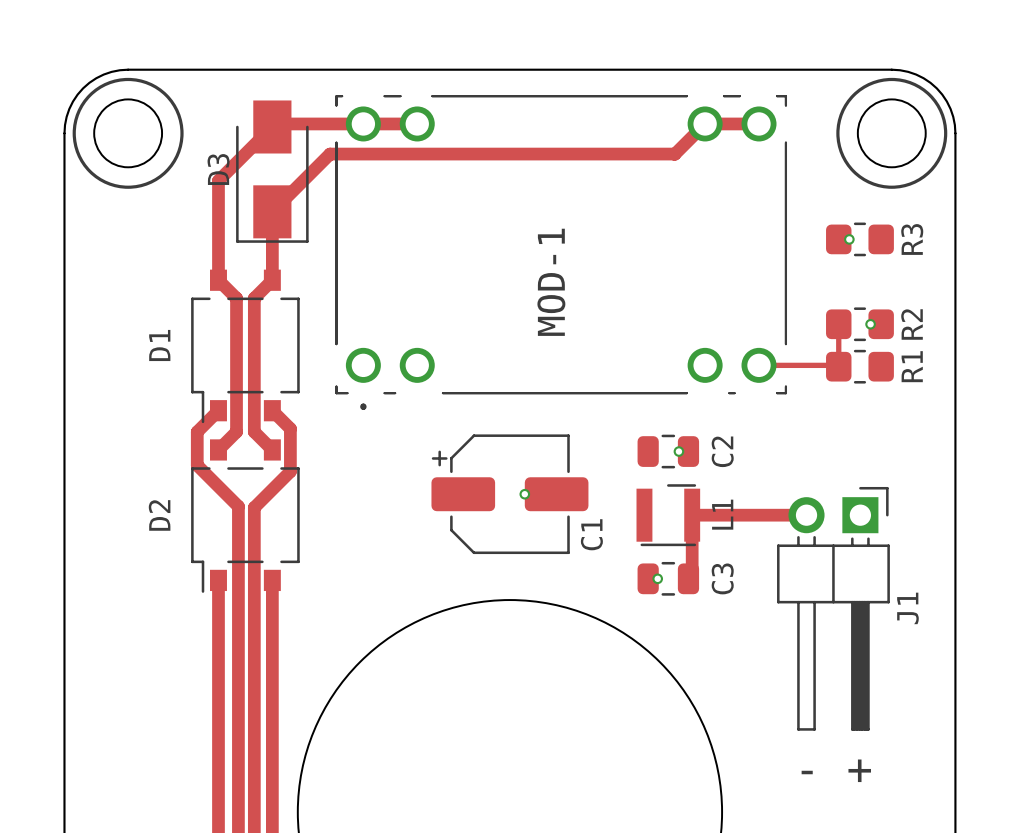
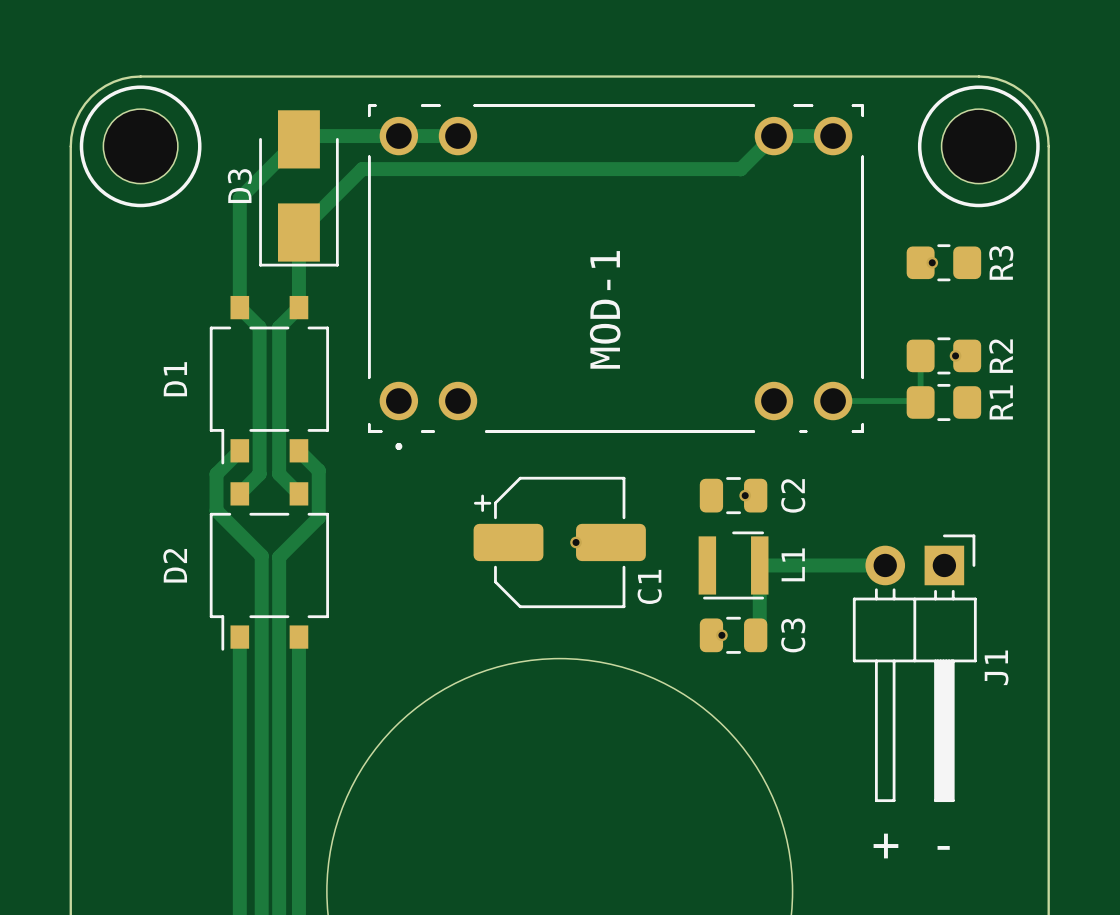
text: - + (836, 770) -> + - (911, 846)

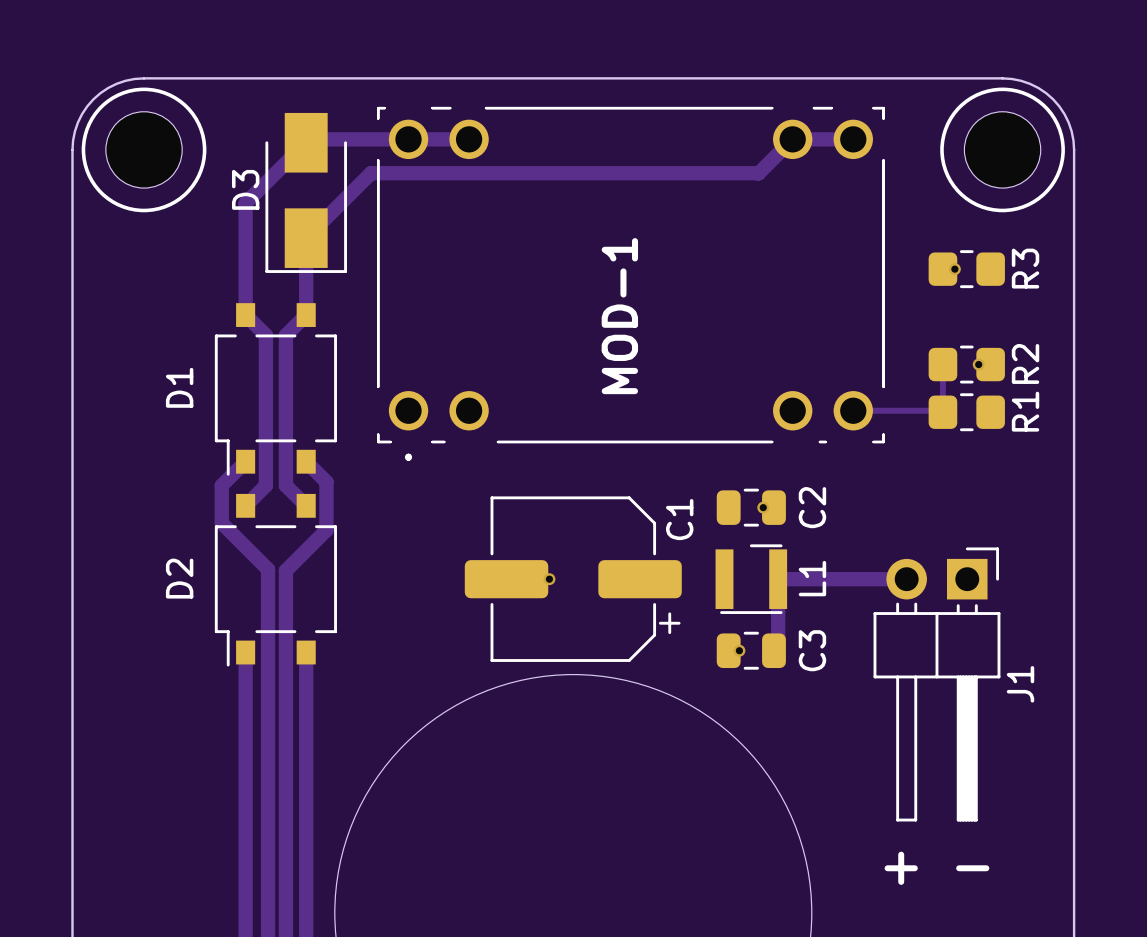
C1 footprint: [473, 476, 646, 609] -> [464, 496, 682, 662]
via position: (576, 542) -> (549, 579)
C1 name position: C1 (649, 586) -> C1 (679, 519)

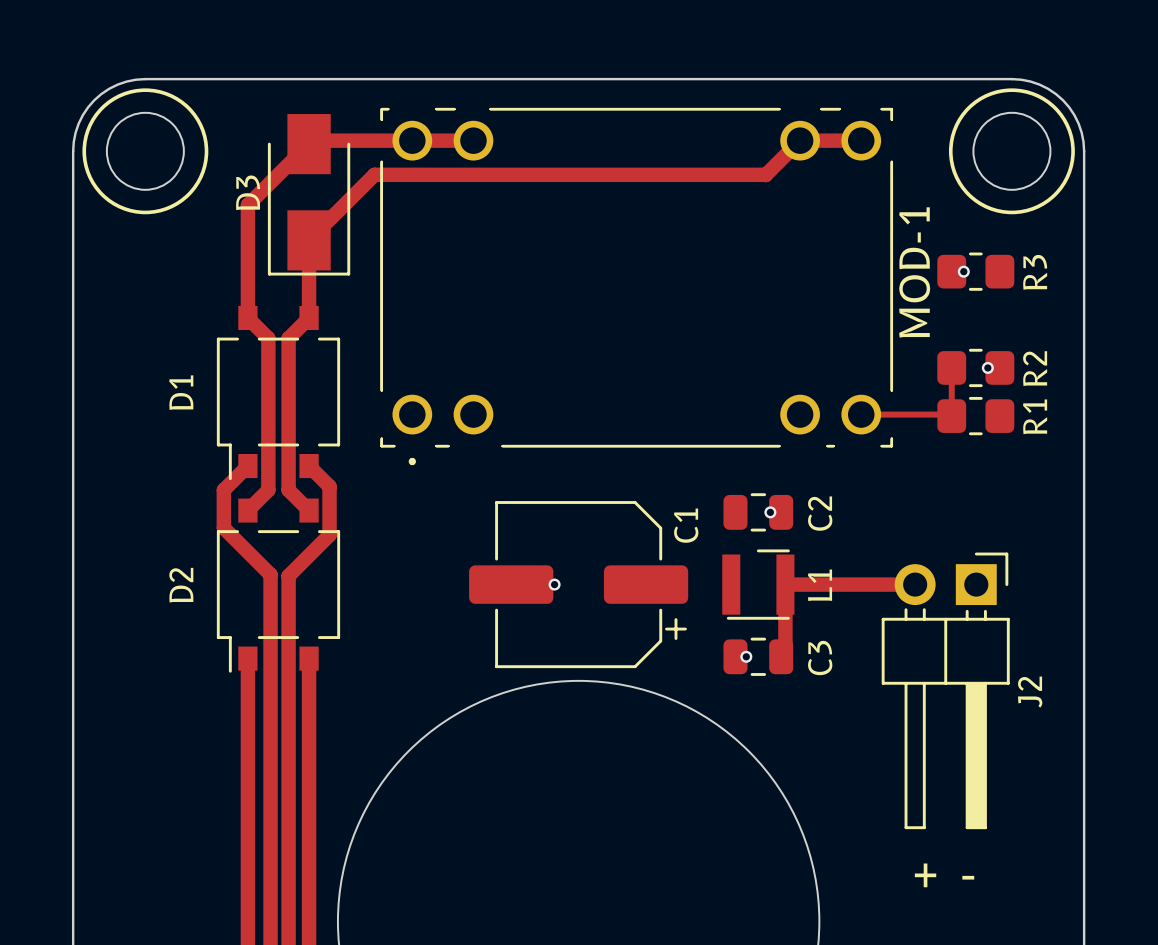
MOD-1 name position: MOD-1 (619, 316) -> MOD-1 (914, 272)
J1 name: J1 (1020, 684) -> J2 (1030, 692)

